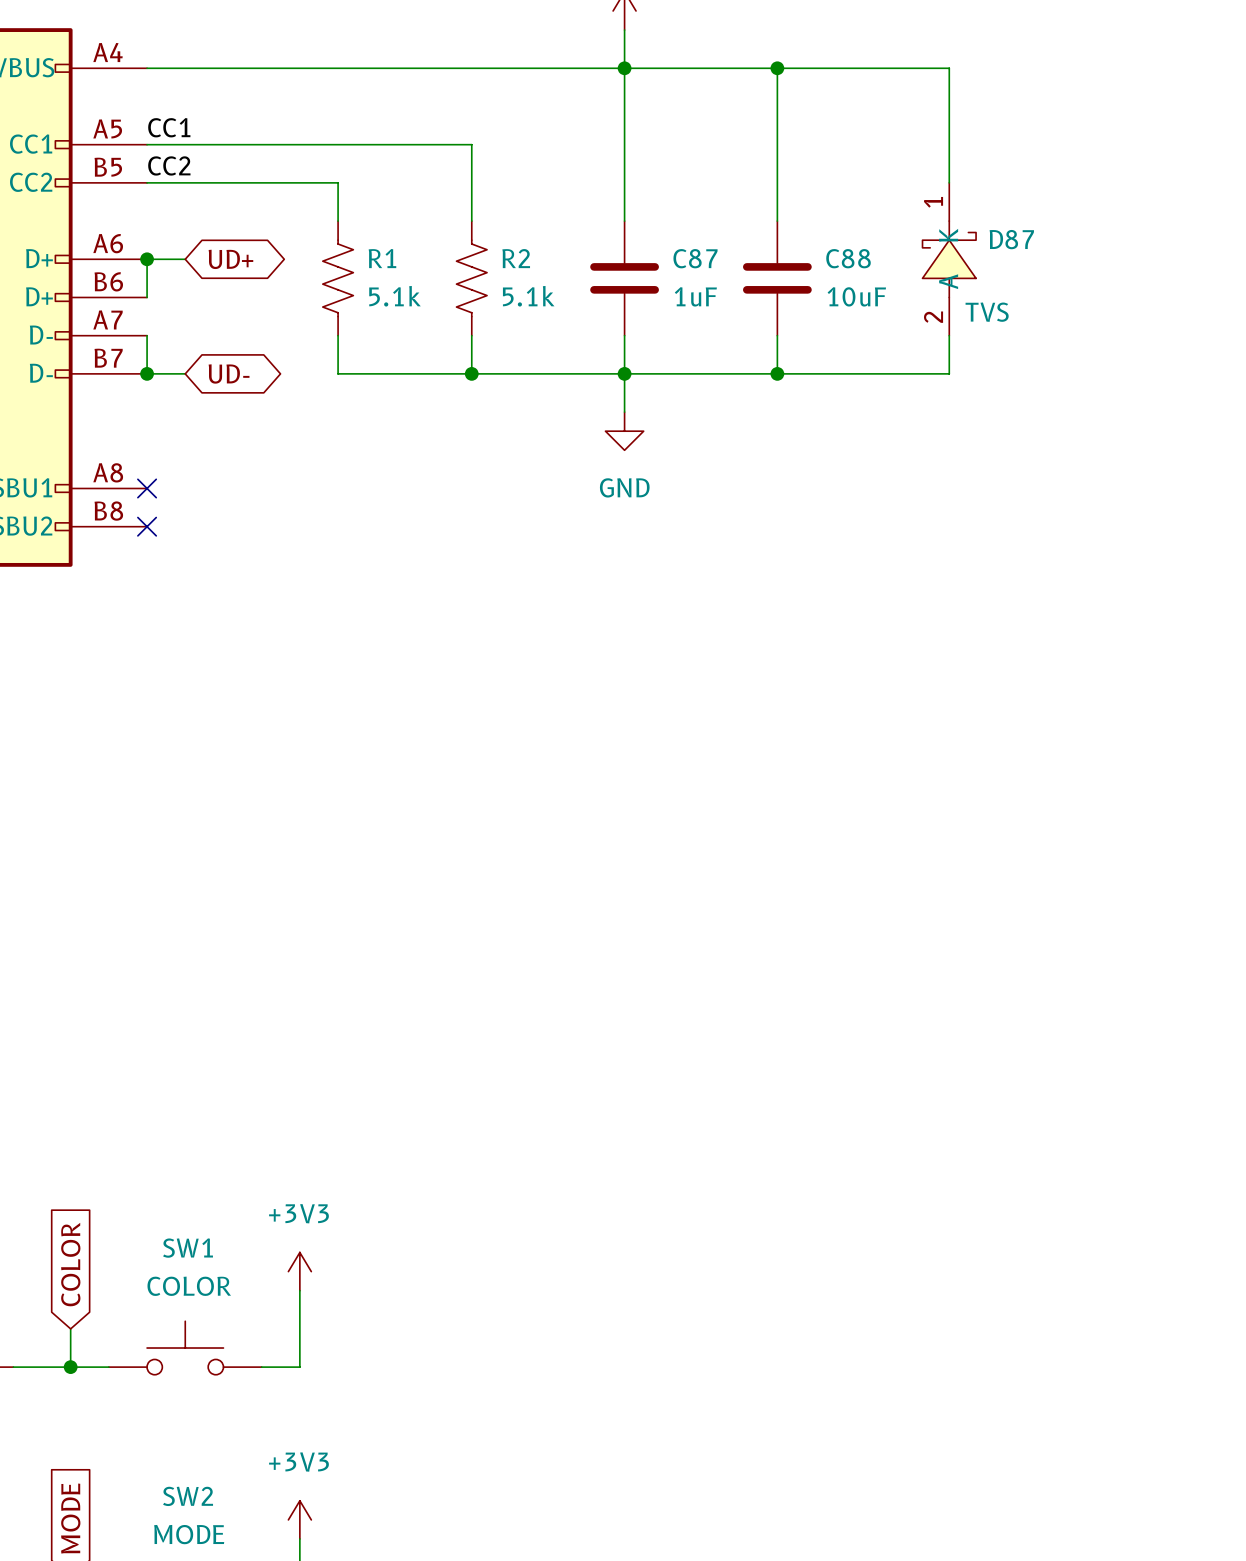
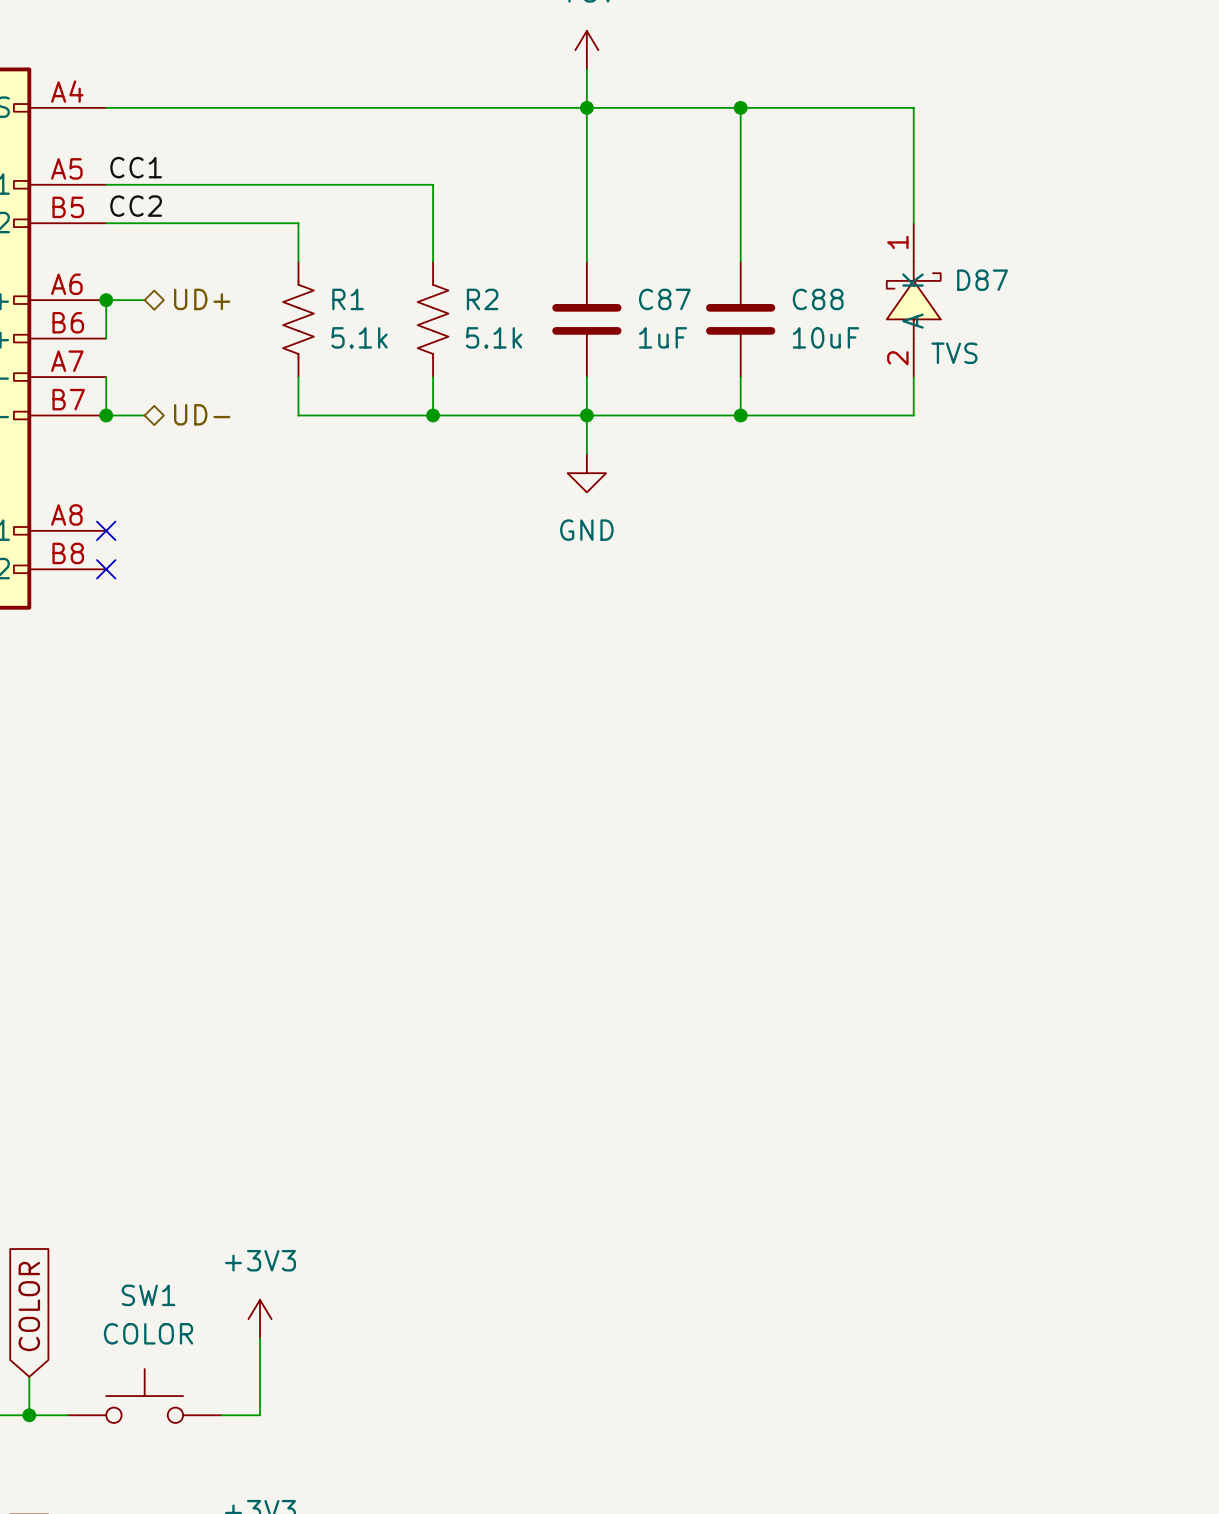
hierarchical label: none -> UD+ (202, 299)
global label: UD+ (230, 259) -> none
global label: UD- (229, 373) -> none
hierarchical label: none -> UD- (202, 414)

